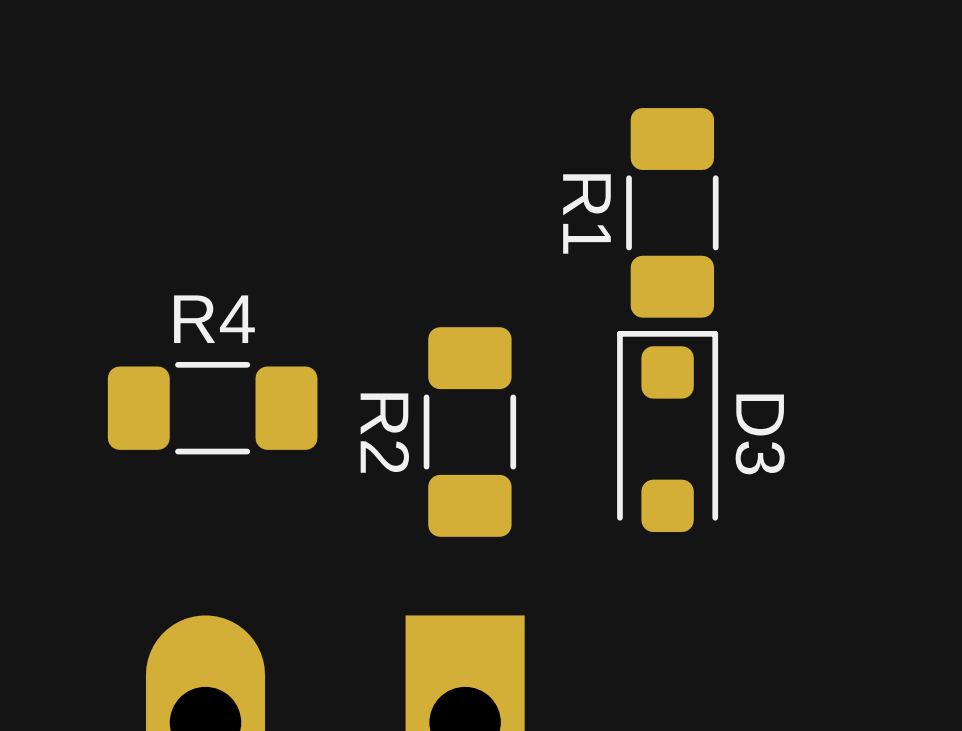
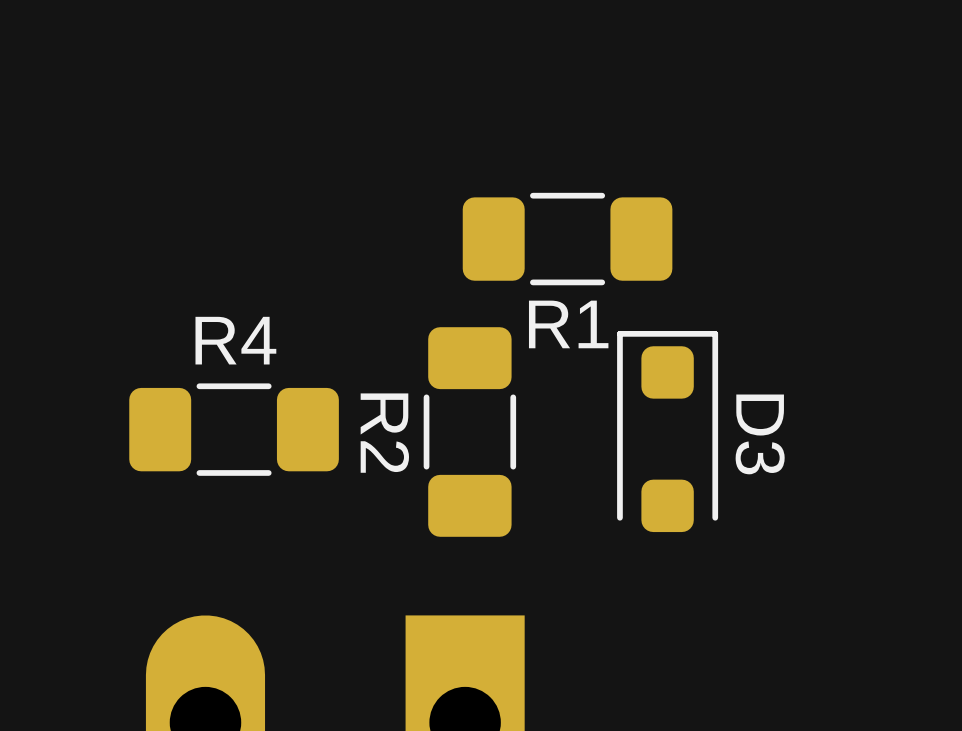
R1 rotation: 0° (672, 212) -> 90° clockwise (567, 239)
R1 name position: R1 (586, 214) -> R1 (568, 324)
R4 position: (212, 408) -> (234, 429)

